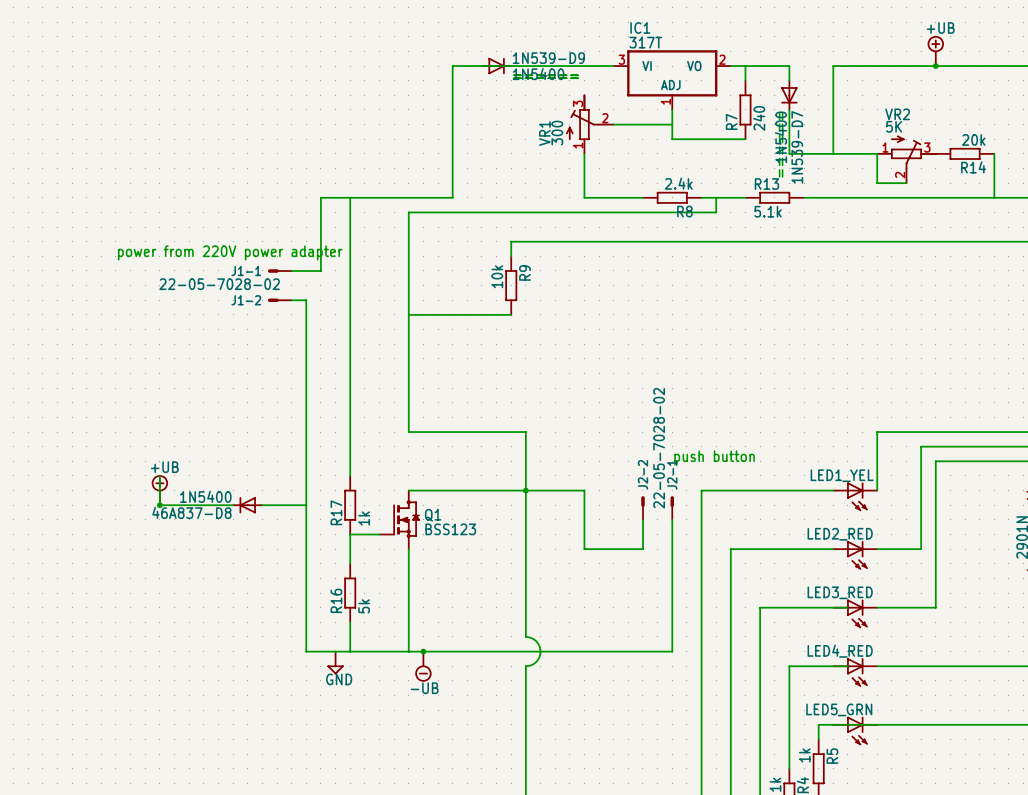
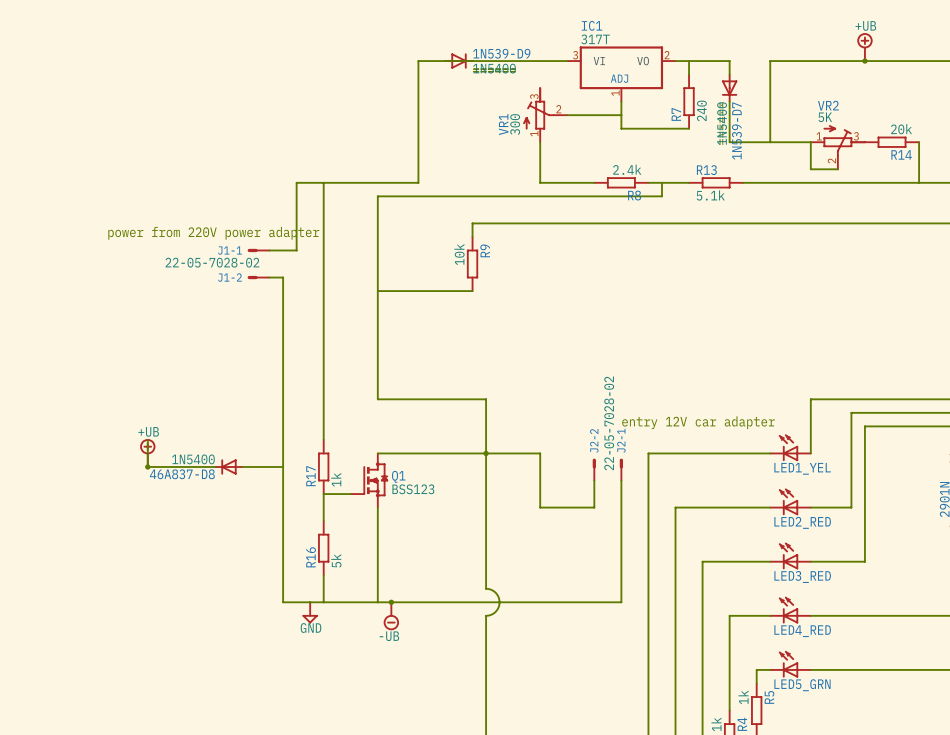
text: push button (714, 457) -> entry 12V car adapter (698, 422)
LED1_YEL rotation: 0° (857, 496) -> 180° (788, 447)
LED2_RED rotation: 0° (857, 555) -> 180° (788, 501)
LED3_RED rotation: 0° (857, 613) -> 180° (788, 556)
LED4_RED rotation: 0° (857, 672) -> 180° (788, 610)
LED5_GRN rotation: 0° (857, 730) -> 180° (788, 664)

